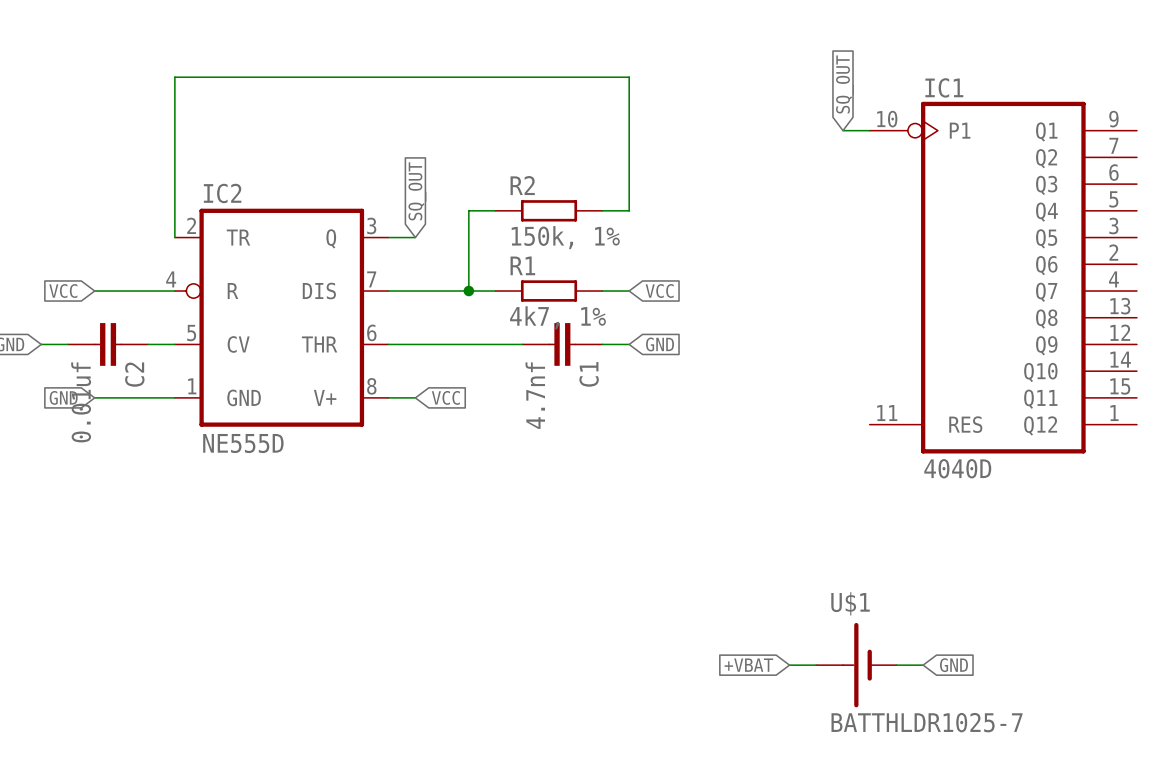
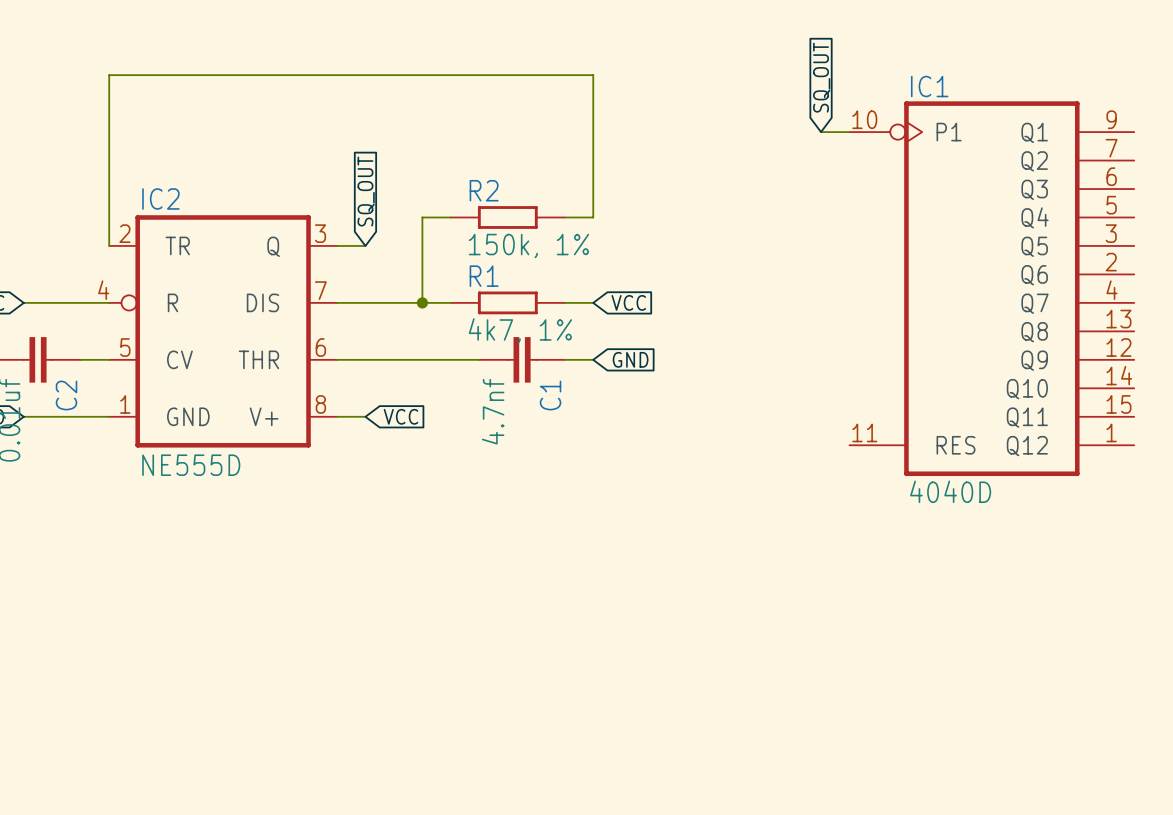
global label: +VBAT (748, 665) -> none
wire: (789, 665) (816, 665) -> none
U$1: BATTHLDR1025-7 (856, 665) -> none
wire: (896, 665) (923, 665) -> none
global label: GND (953, 665) -> none

